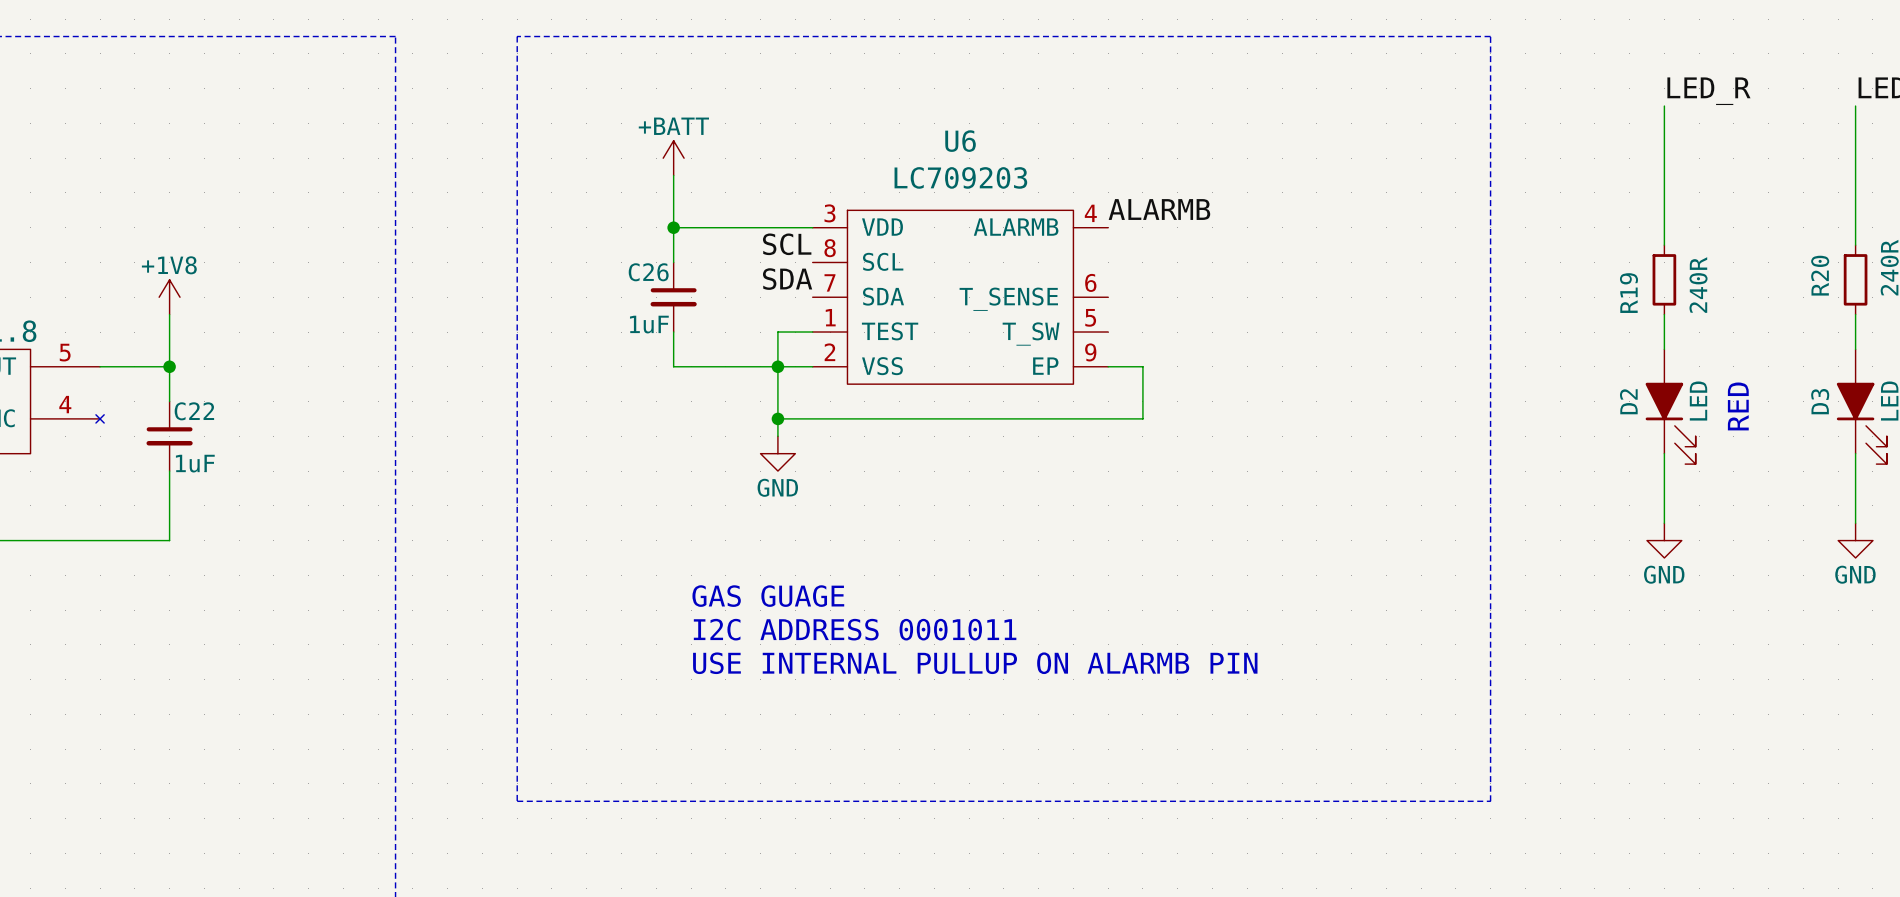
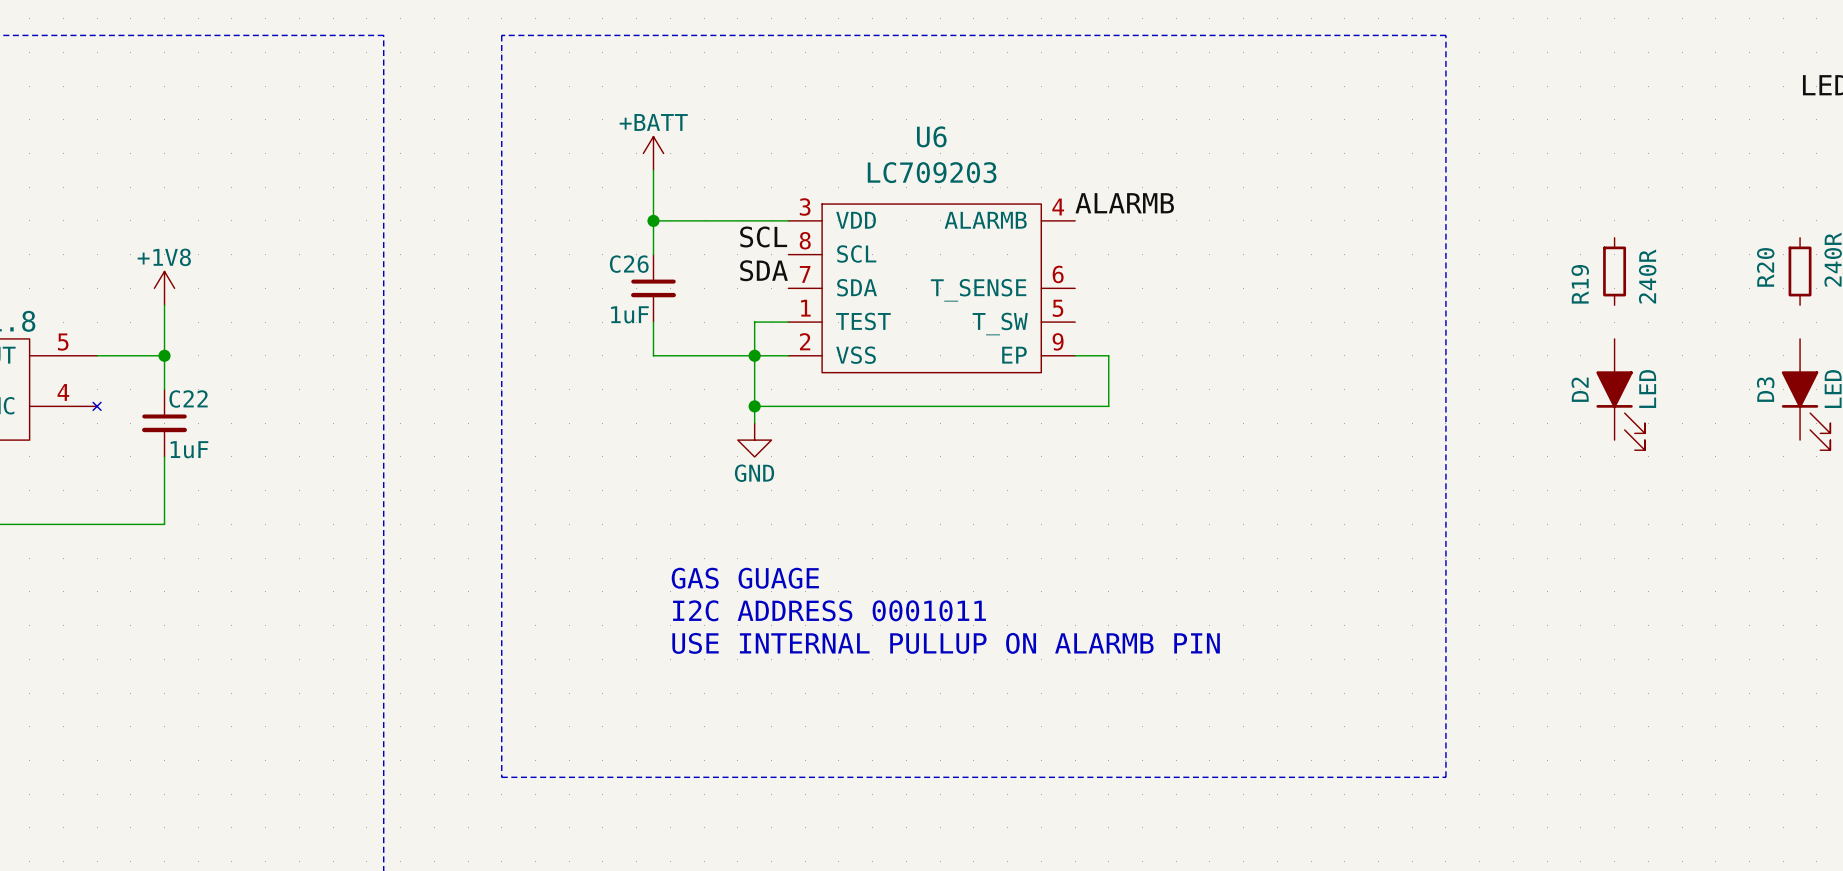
label: LED_R (1708, 91) -> none
wire: (1664, 106) (1664, 245) -> none
wire: (1855, 106) (1855, 245) -> none
wire: (1664, 314) (1664, 349) -> none
wire: (1855, 314) (1855, 349) -> none
text: RED (1738, 406) -> none
wire: (1664, 453) (1664, 523) -> none
wire: (1855, 453) (1855, 523) -> none
power symbol: GND (1664, 540) -> none
power symbol: GND (1855, 540) -> none

